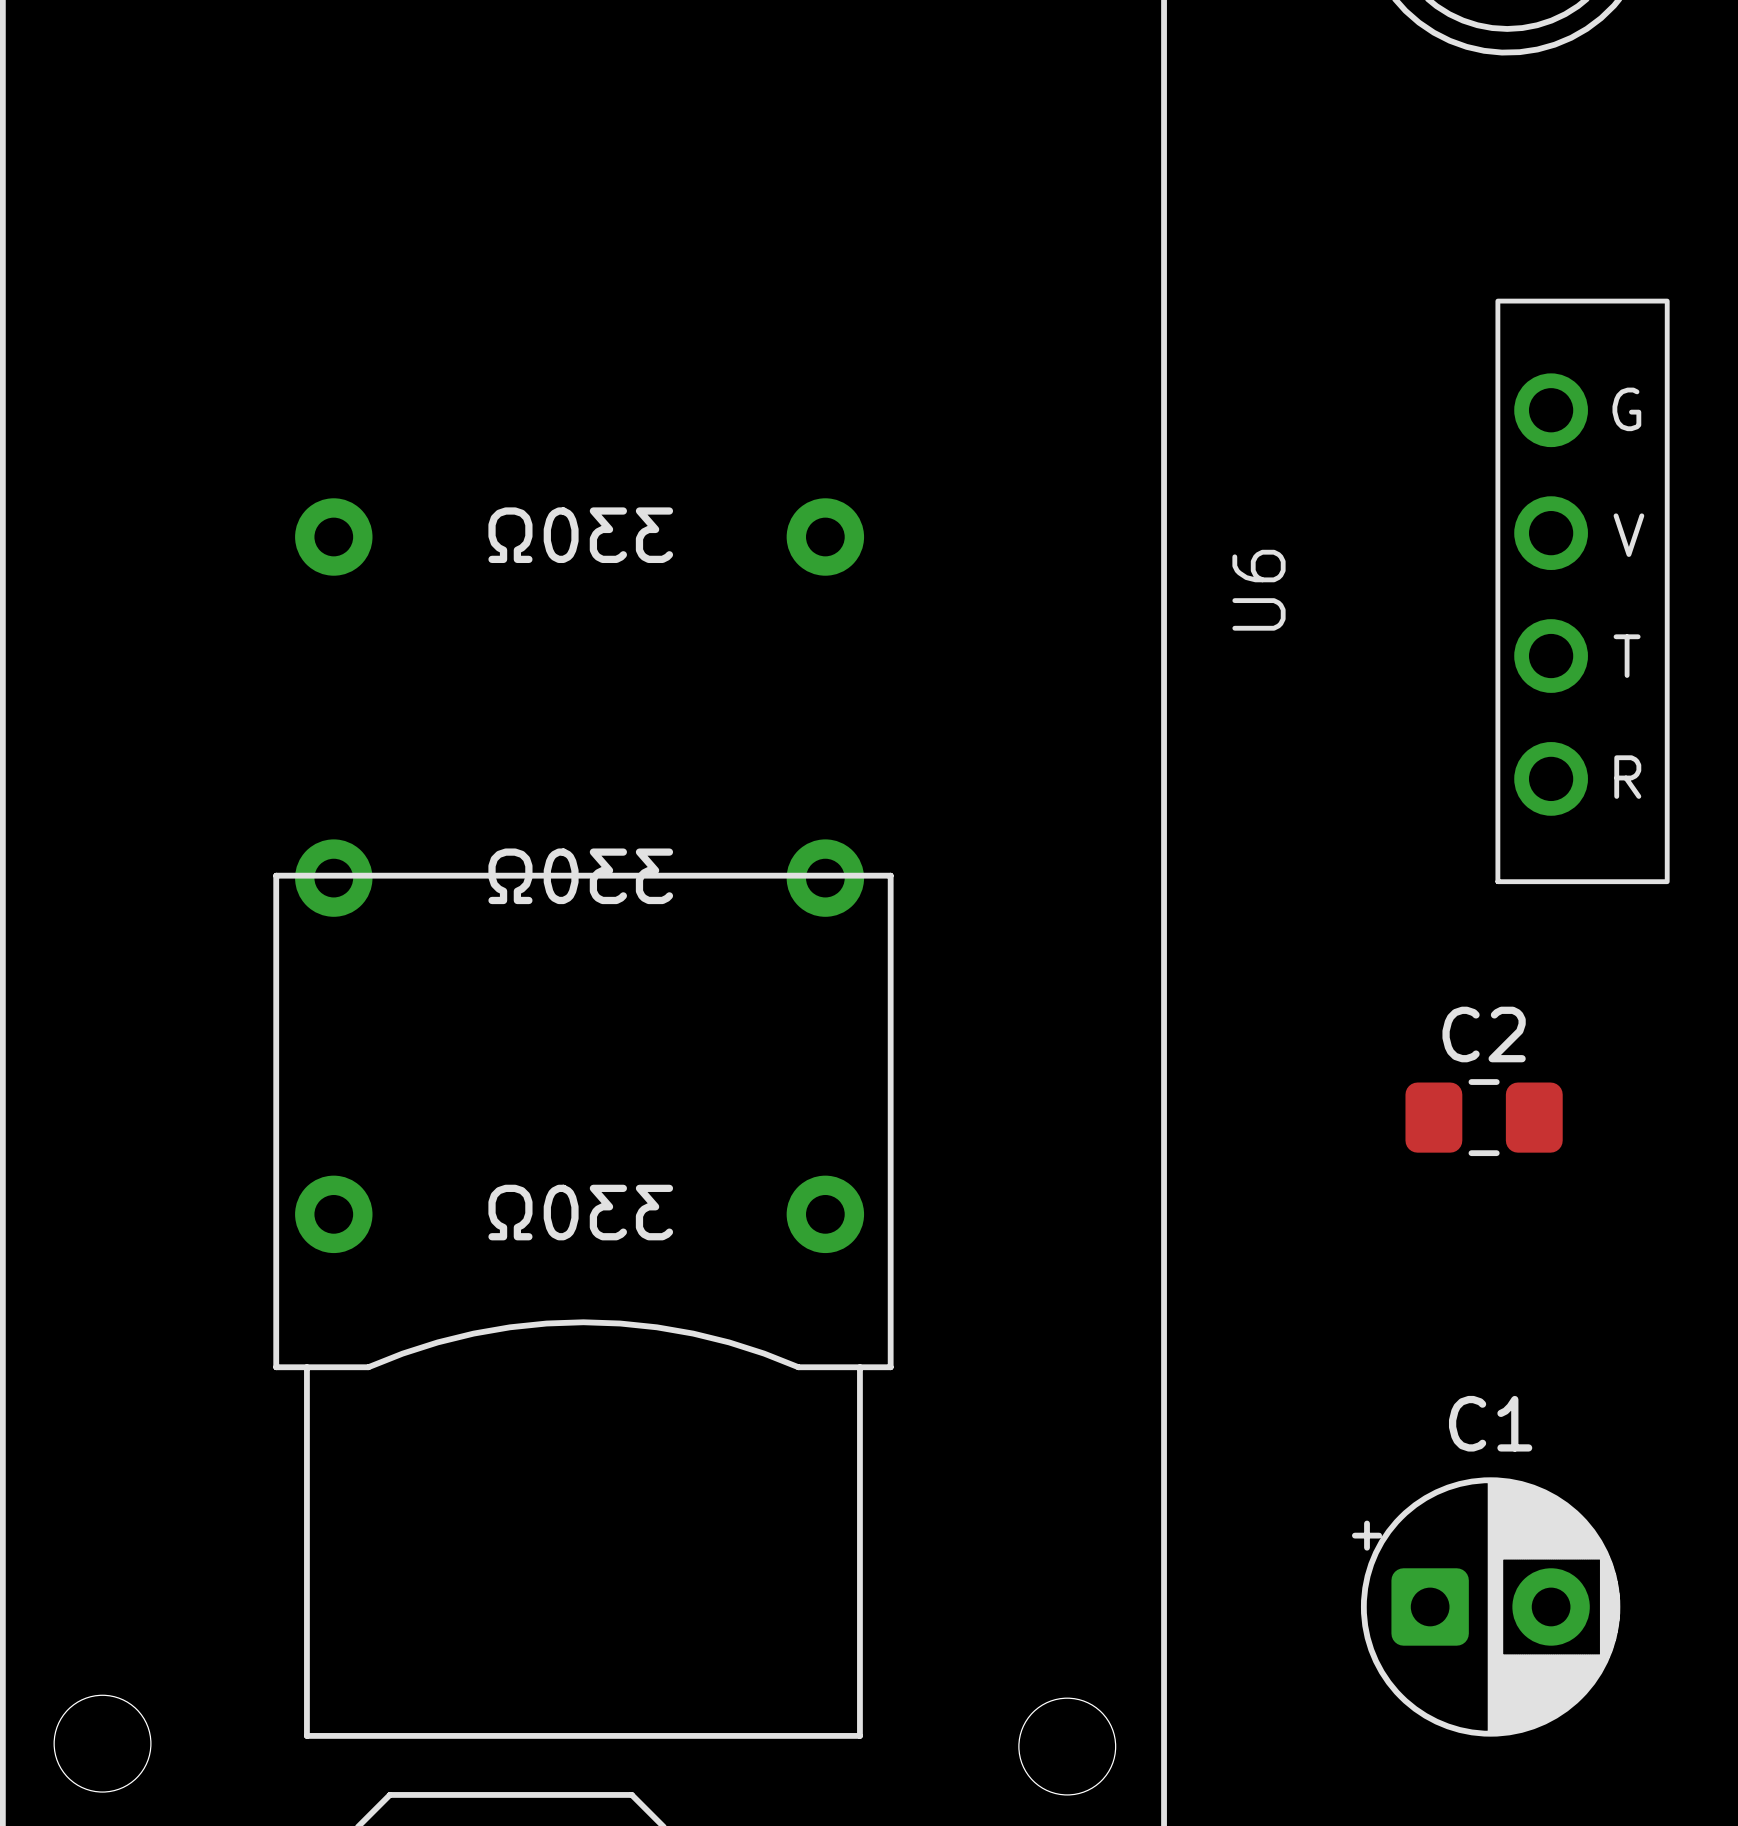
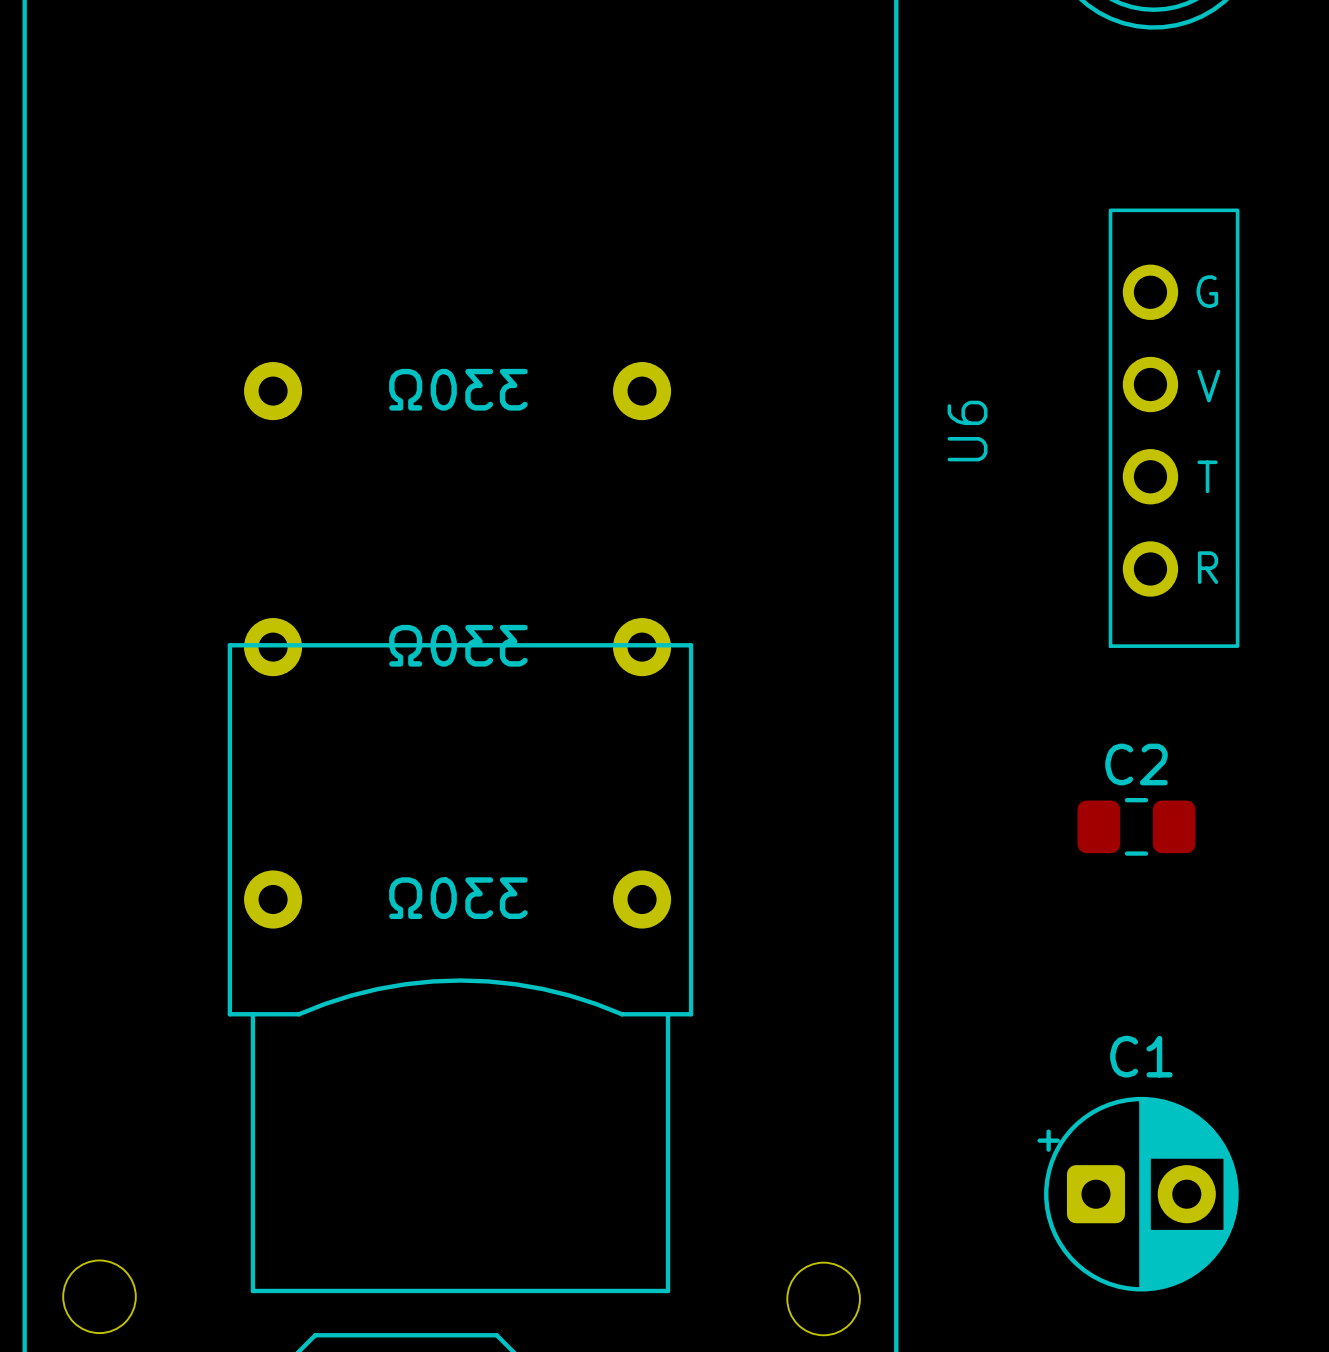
U6 position: (1582, 591) -> (1174, 428)

